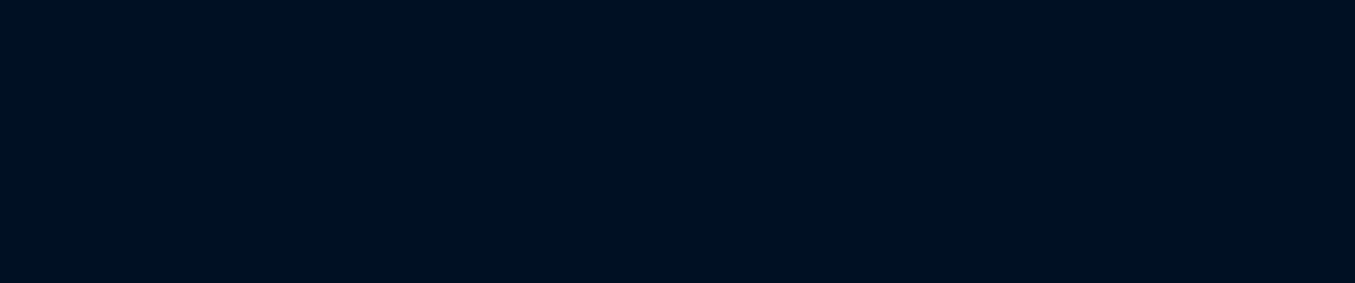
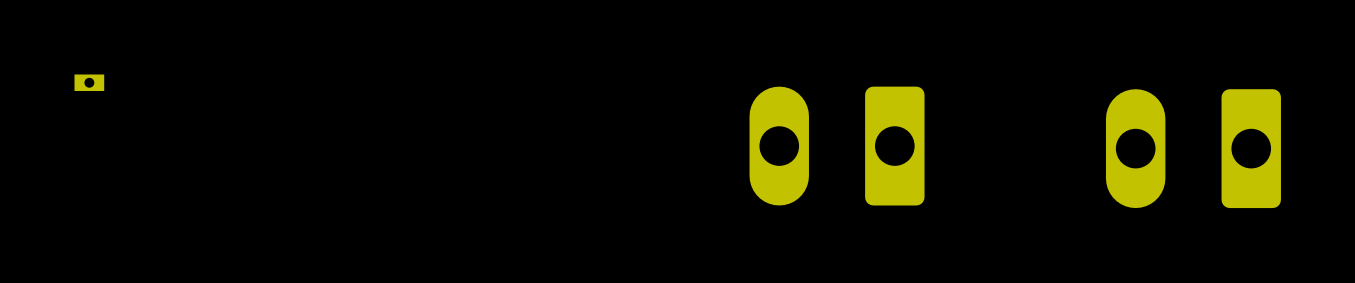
part: none -> (89, 82)
part: none -> (837, 146)
part: none -> (1193, 148)

